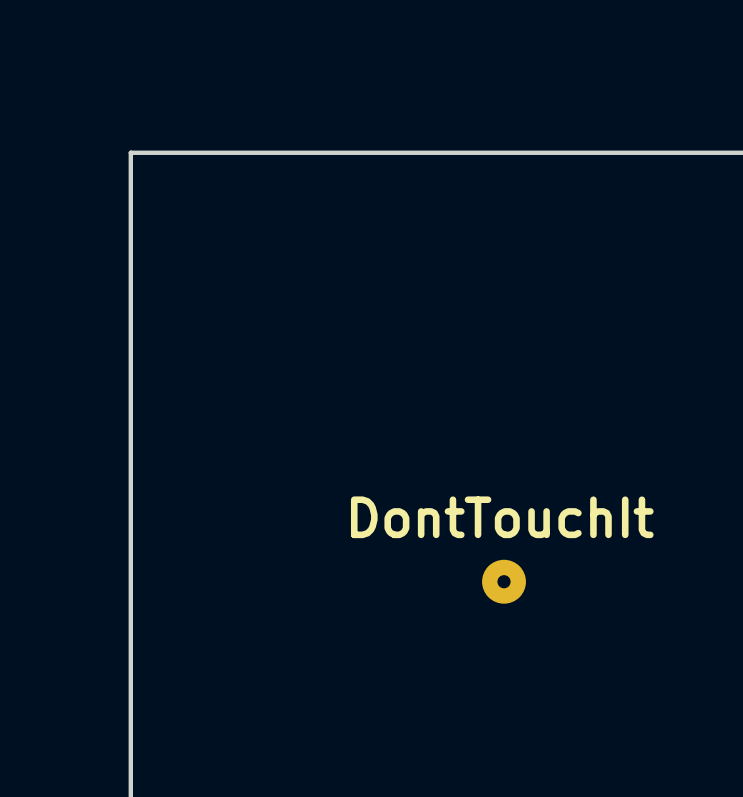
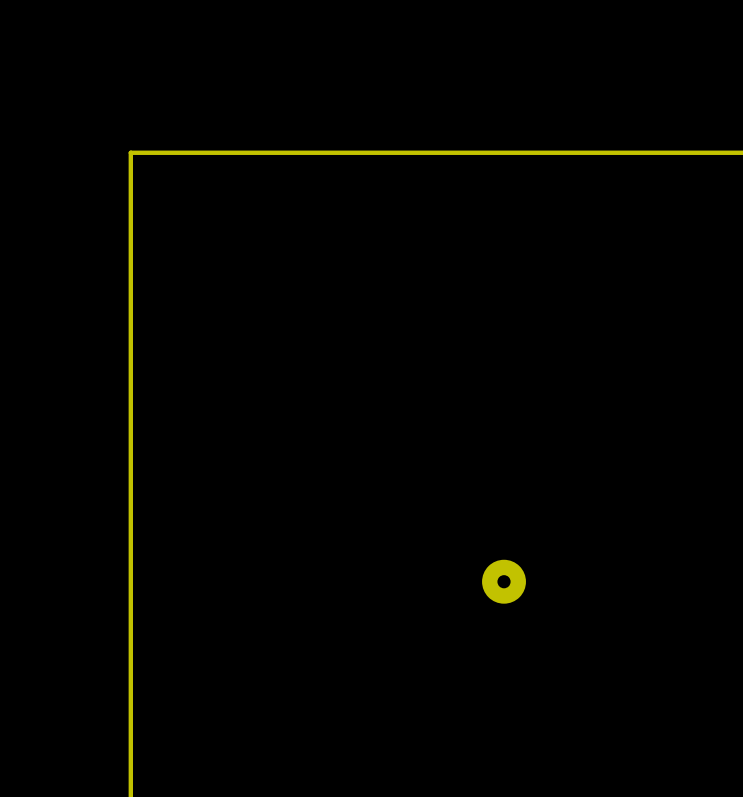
text: DontTouchIt (502, 517) -> none

